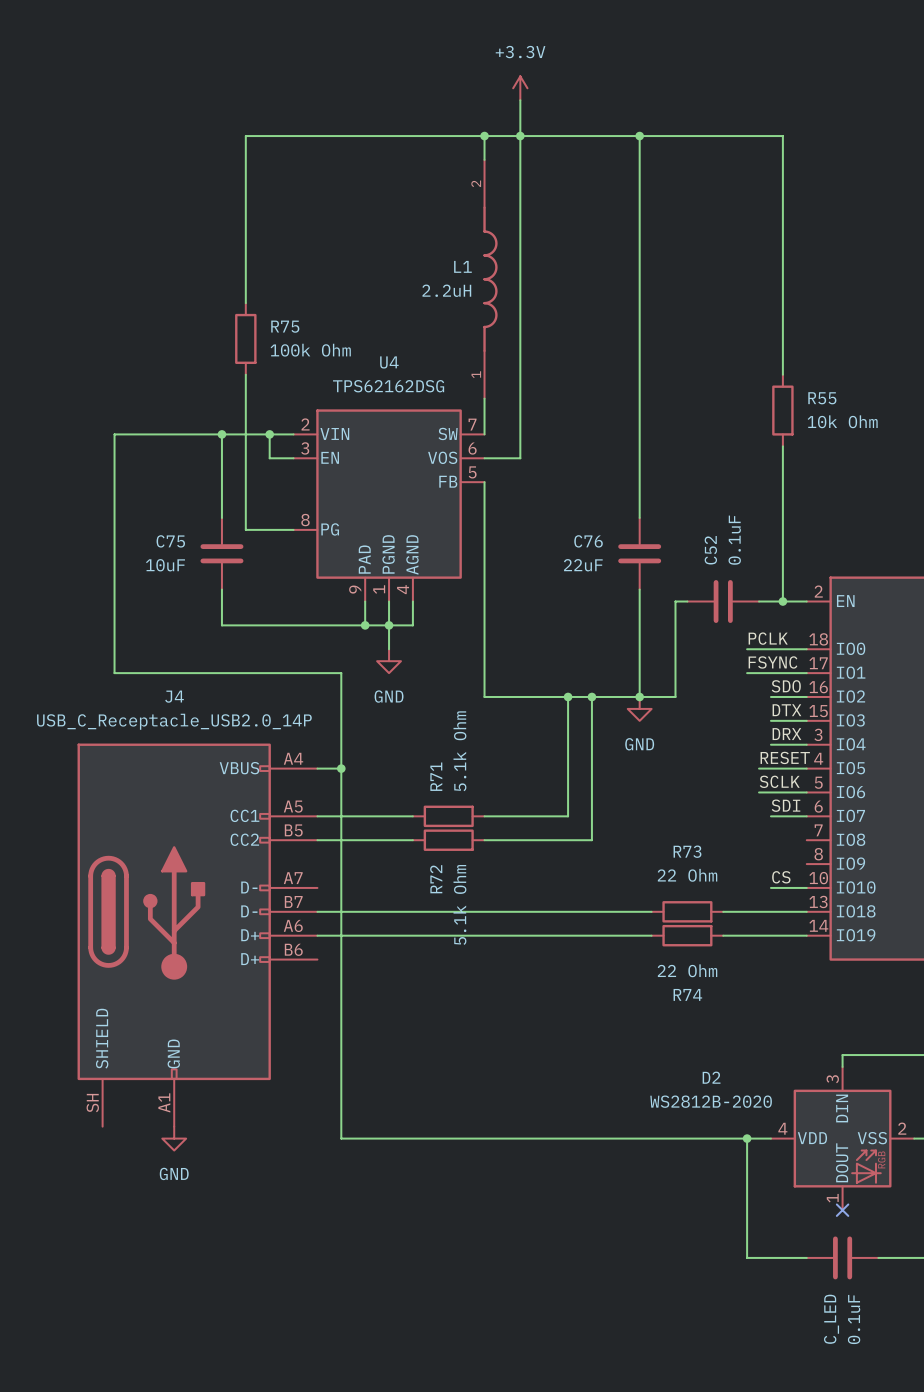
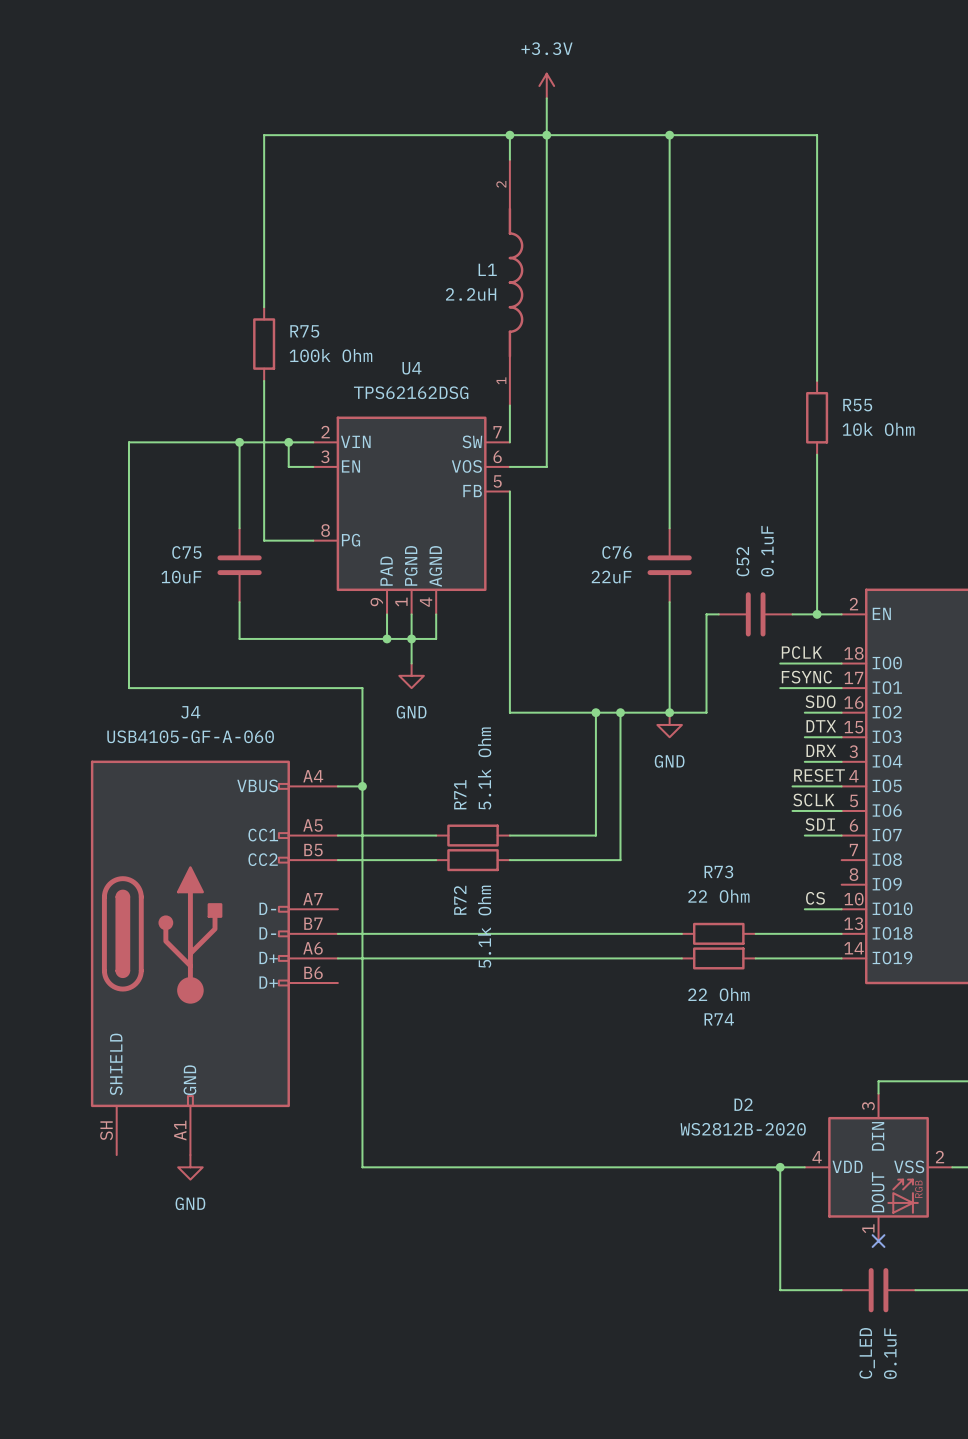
J4 value: USB_C_Receptacle_USB2.0_14P (174, 721) -> USB4105-GF-A-060 (190, 736)

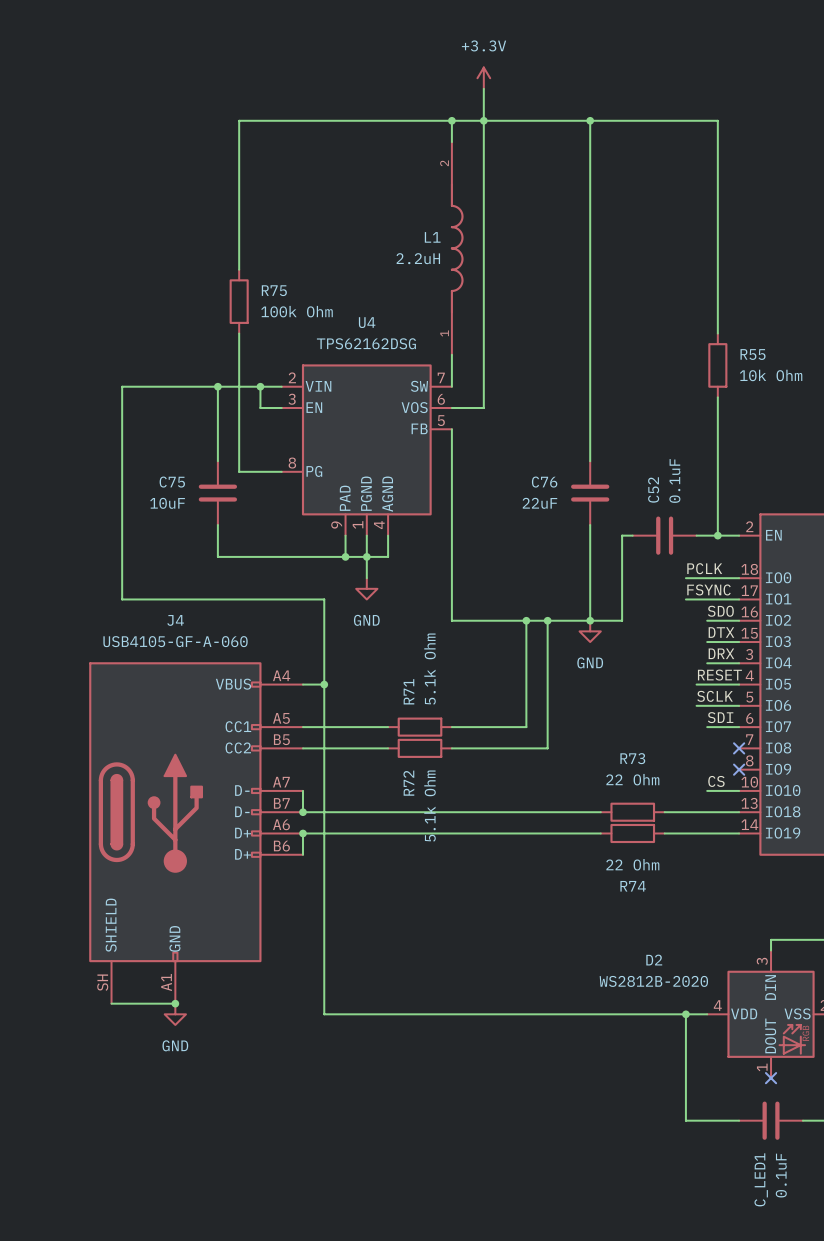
no-connect mark: none -> (739, 748)
no-connect mark: none -> (739, 769)
wire: none -> (302, 790) (302, 812)
junction: none -> (302, 812)
wire: none -> (302, 833) (302, 854)
junction: none -> (302, 833)
wire: none -> (111, 1003) (175, 1003)
junction: none -> (175, 1003)
C_LED name: C_LED (867, 1353) -> C_LED1 (761, 1179)

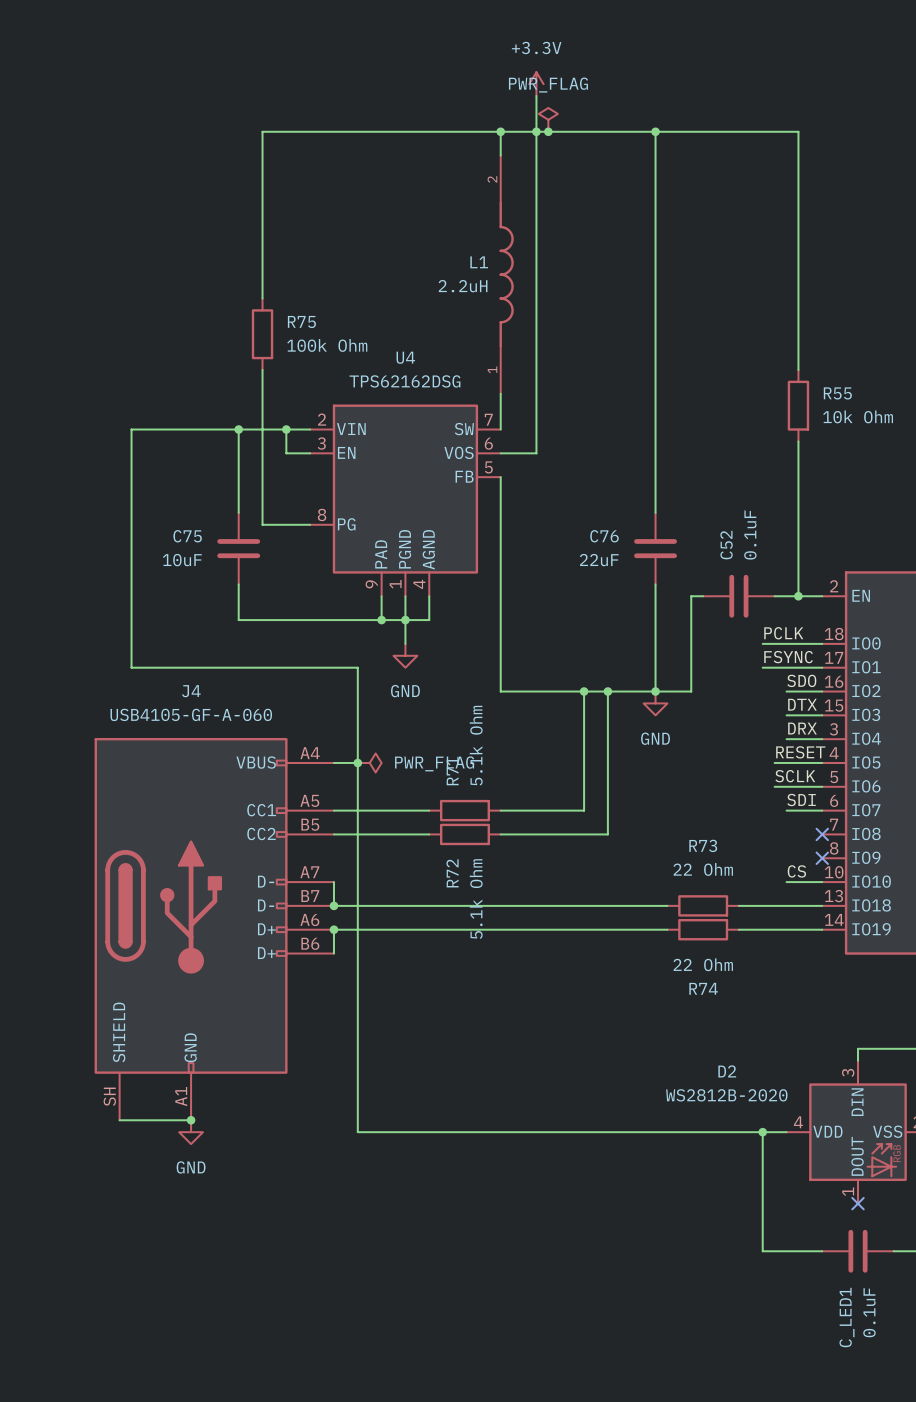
power symbol: none -> PWR_FLAG (548, 119)
junction: none -> (548, 131)
power symbol: none -> PWR_FLAG (369, 762)

